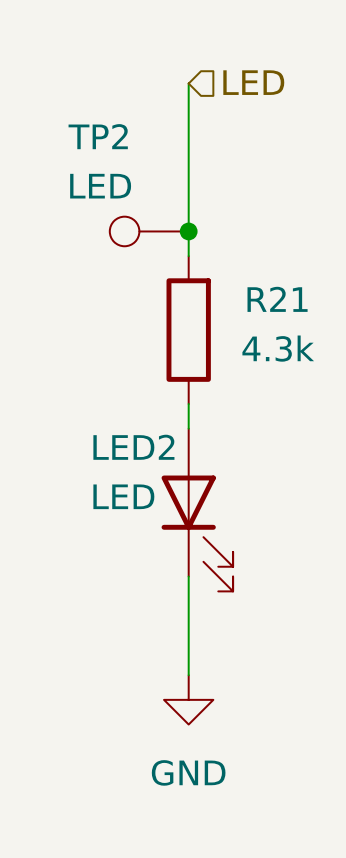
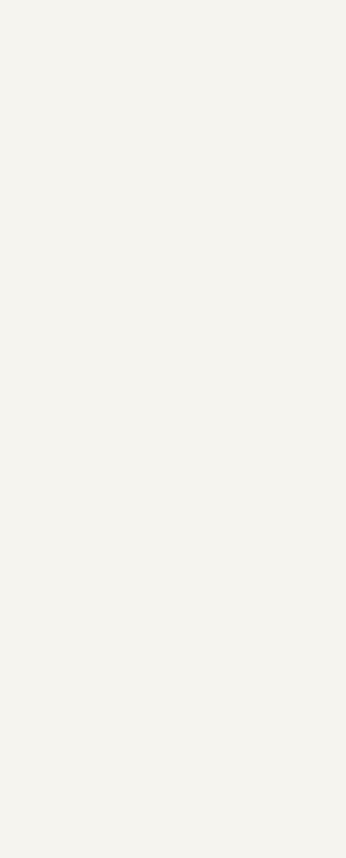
hierarchical label: LED (253, 82) -> none
wire: (188, 83) (188, 256) -> none
TP2: LED (149, 231) -> none
junction: (188, 231) -> none
R21: 4.3k (188, 330) -> none
wire: (188, 404) (188, 428) -> none
LED2: LED (197, 510) -> none
wire: (188, 576) (188, 675) -> none
power symbol: GND (188, 699) -> none

